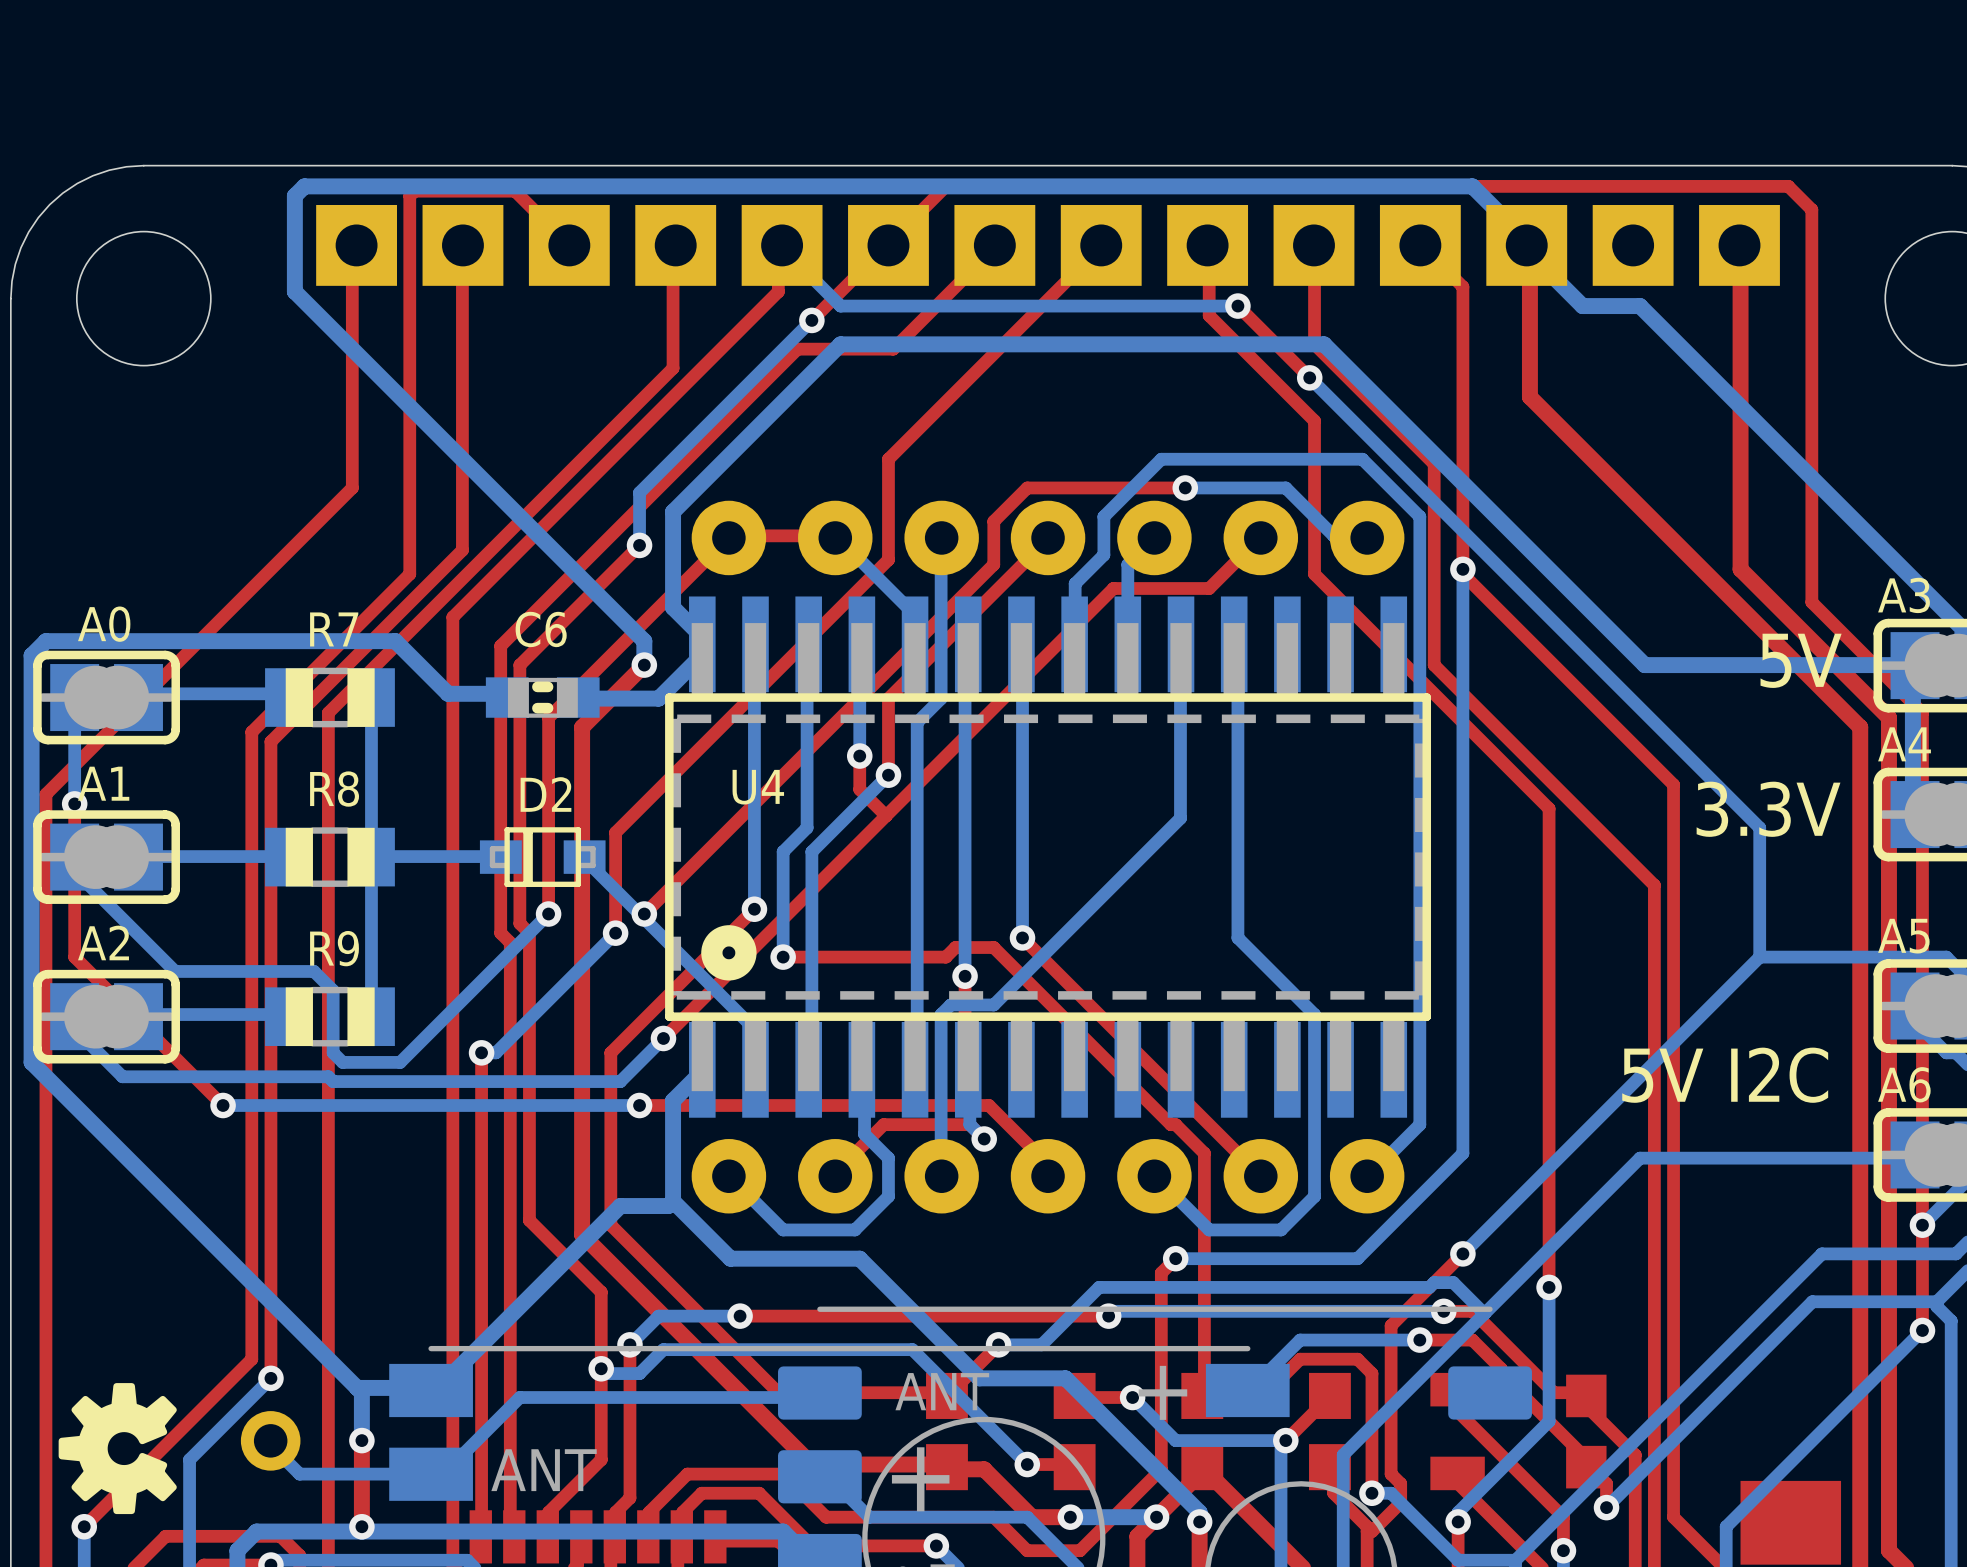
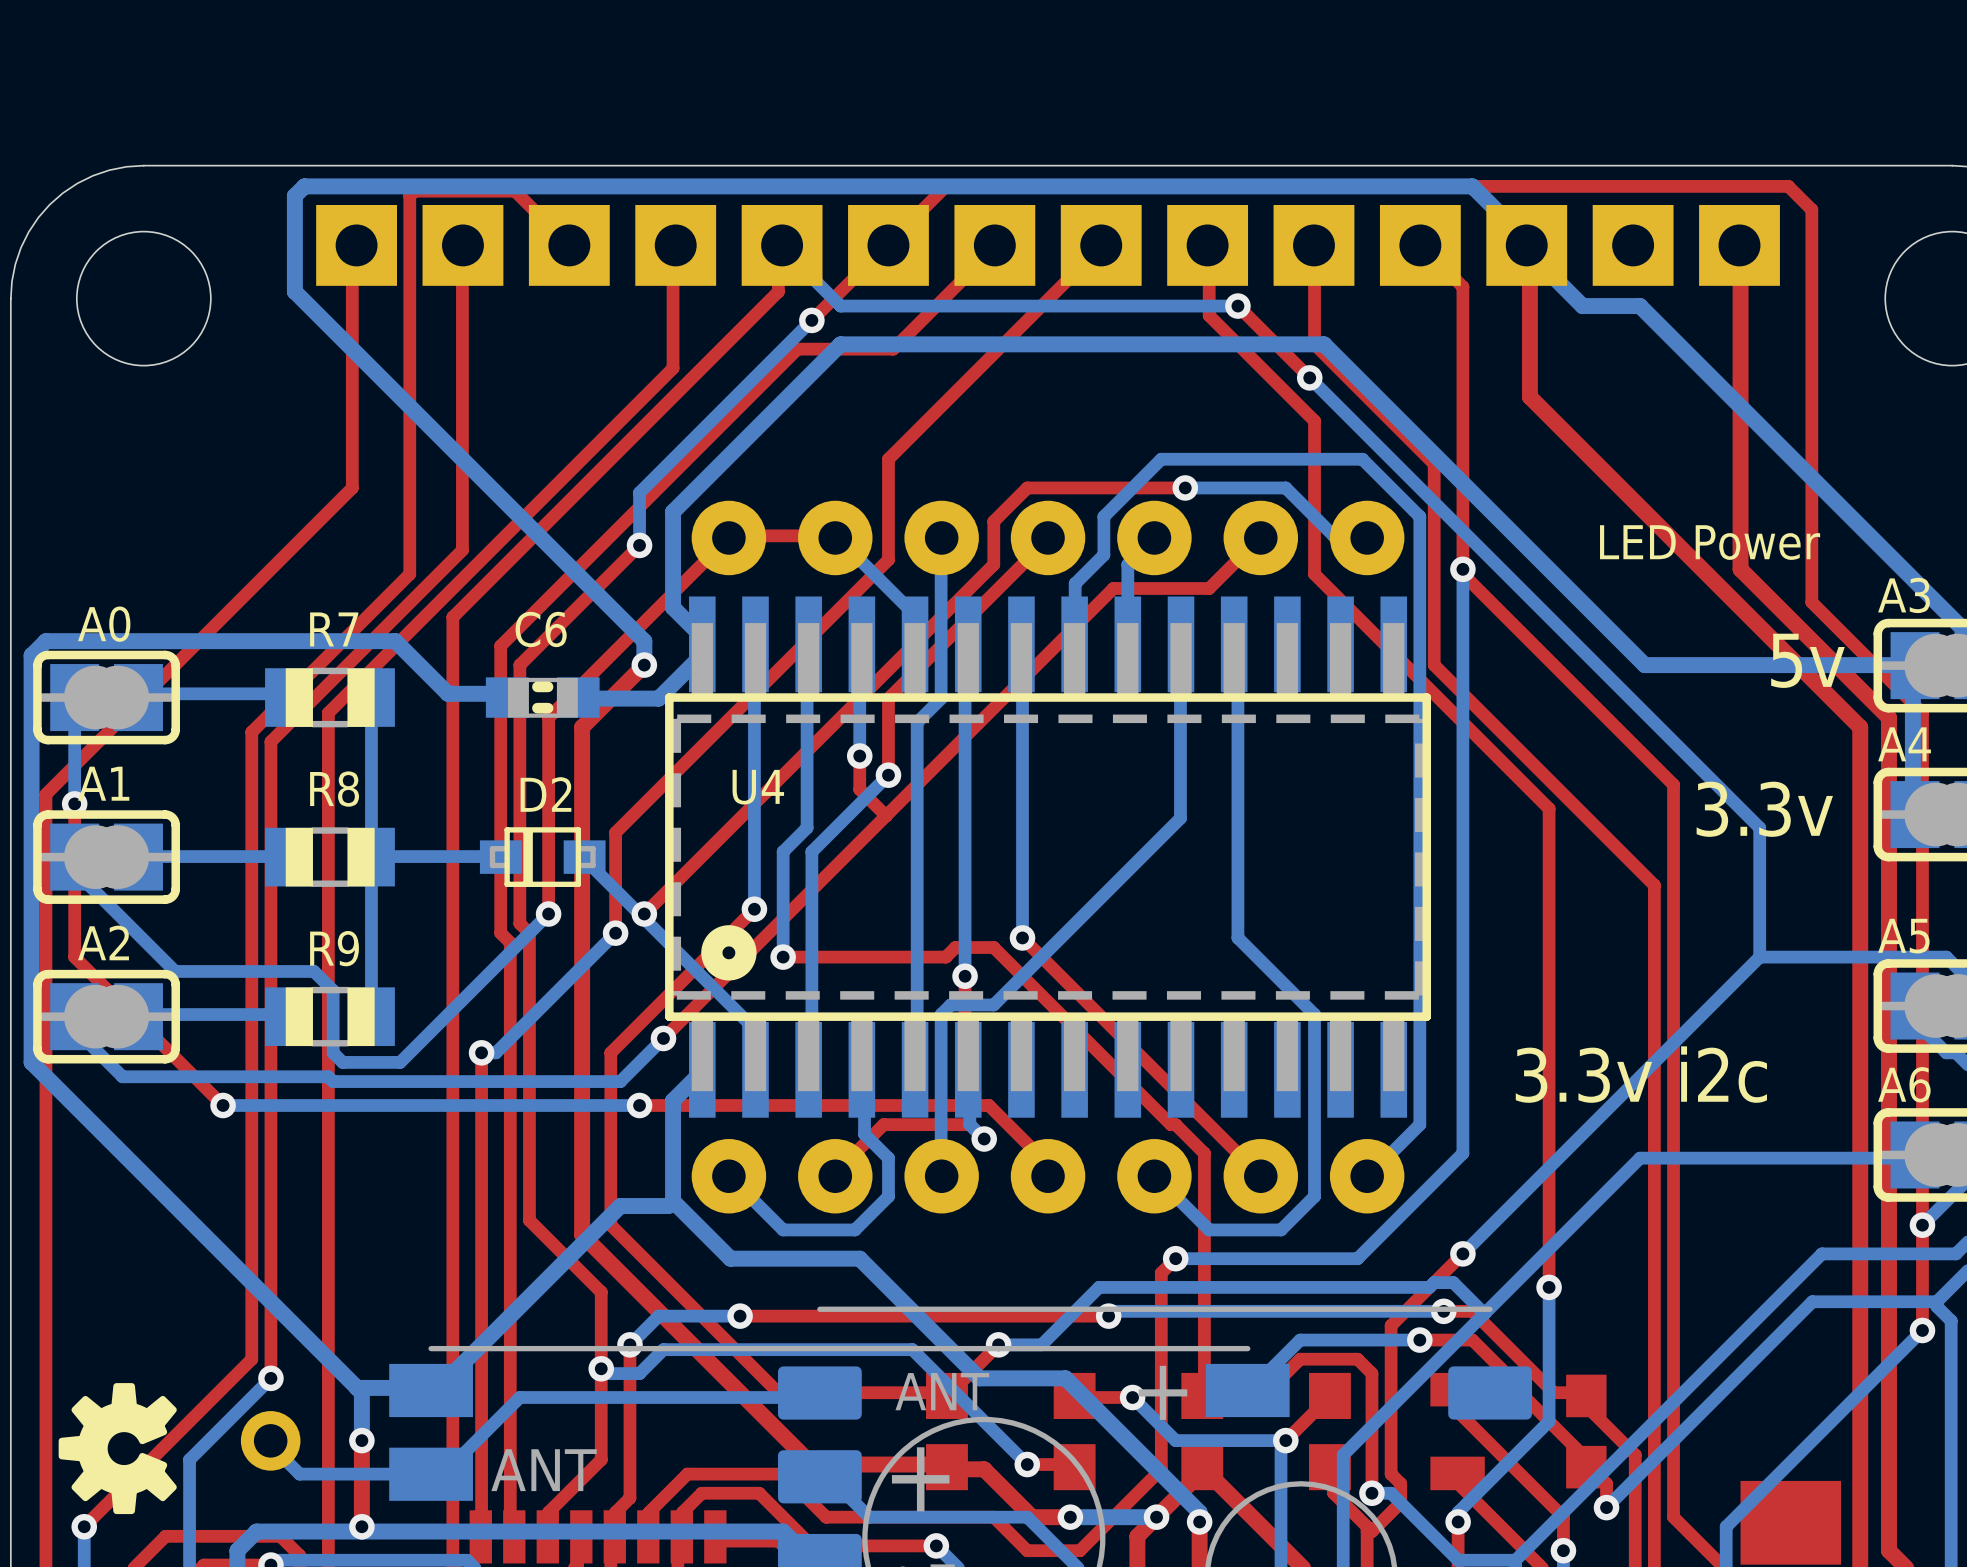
text: none -> LED Power (1710, 542)
text: 5V (1801, 660) -> 5v (1807, 660)
text: 3.3V (1768, 809) -> 3.3v (1764, 809)
text: none -> 3.3v i2c (1641, 1074)
text: 5V I2C (1725, 1075) -> none

